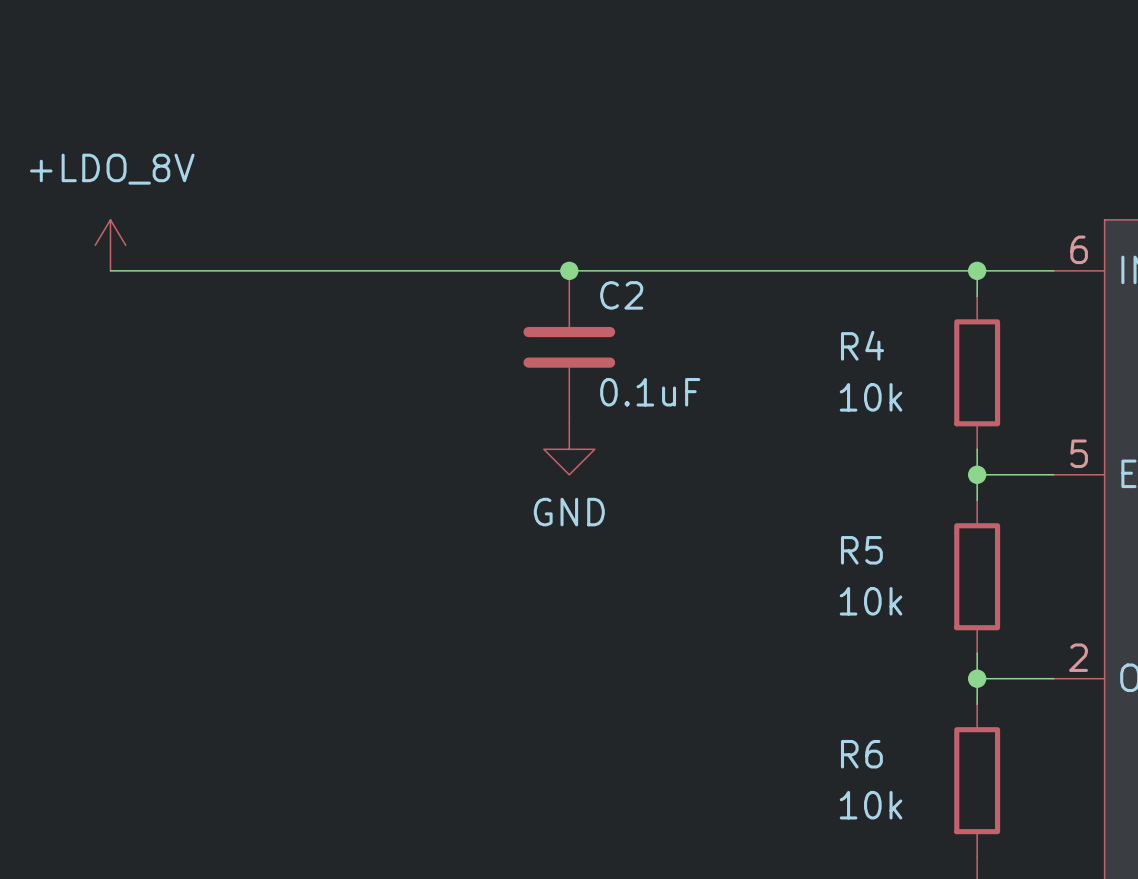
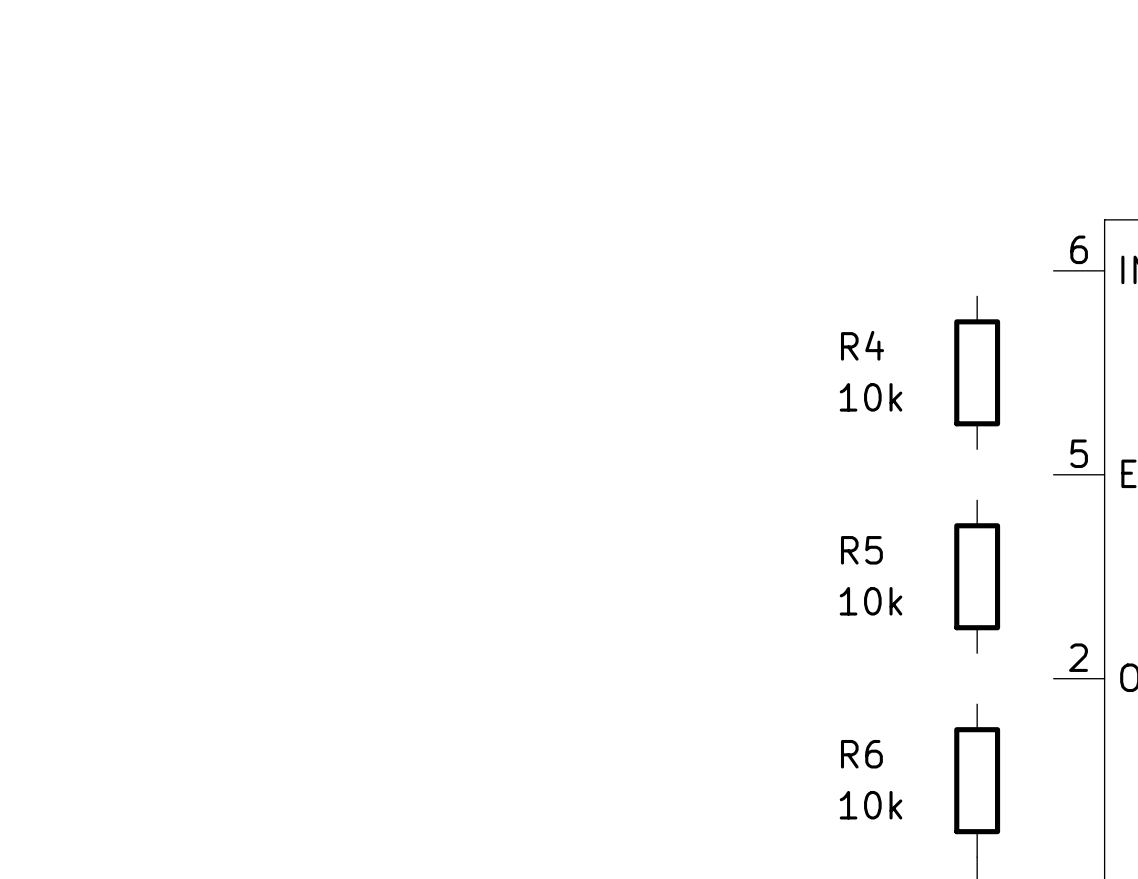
power symbol: +LDO_8V (110, 245) -> none
wire: (110, 270) (1053, 270) -> none
junction: (569, 270) -> none
wire: (977, 270) (977, 296) -> none
junction: (977, 270) -> none
C2: 0.1uF (569, 347) -> none
power symbol: GND (569, 449) -> none
wire: (977, 449) (977, 500) -> none
wire: (977, 474) (1053, 474) -> none
junction: (977, 474) -> none
wire: (977, 653) (977, 704) -> none
wire: (977, 678) (1053, 678) -> none
junction: (977, 678) -> none

